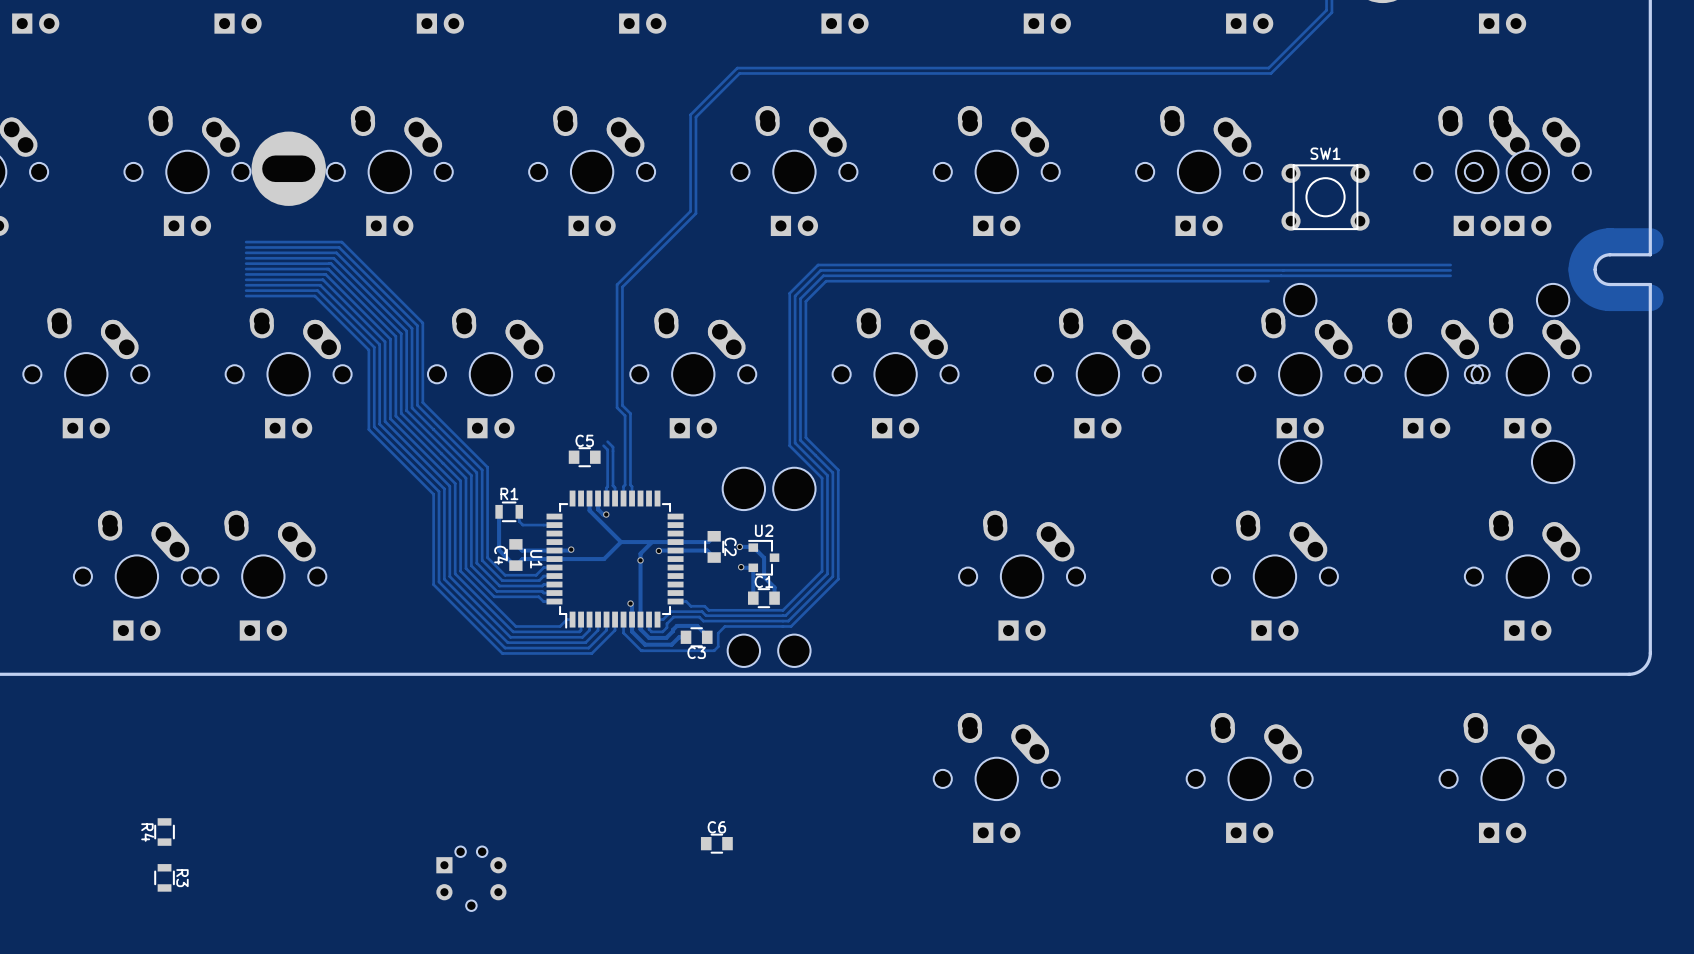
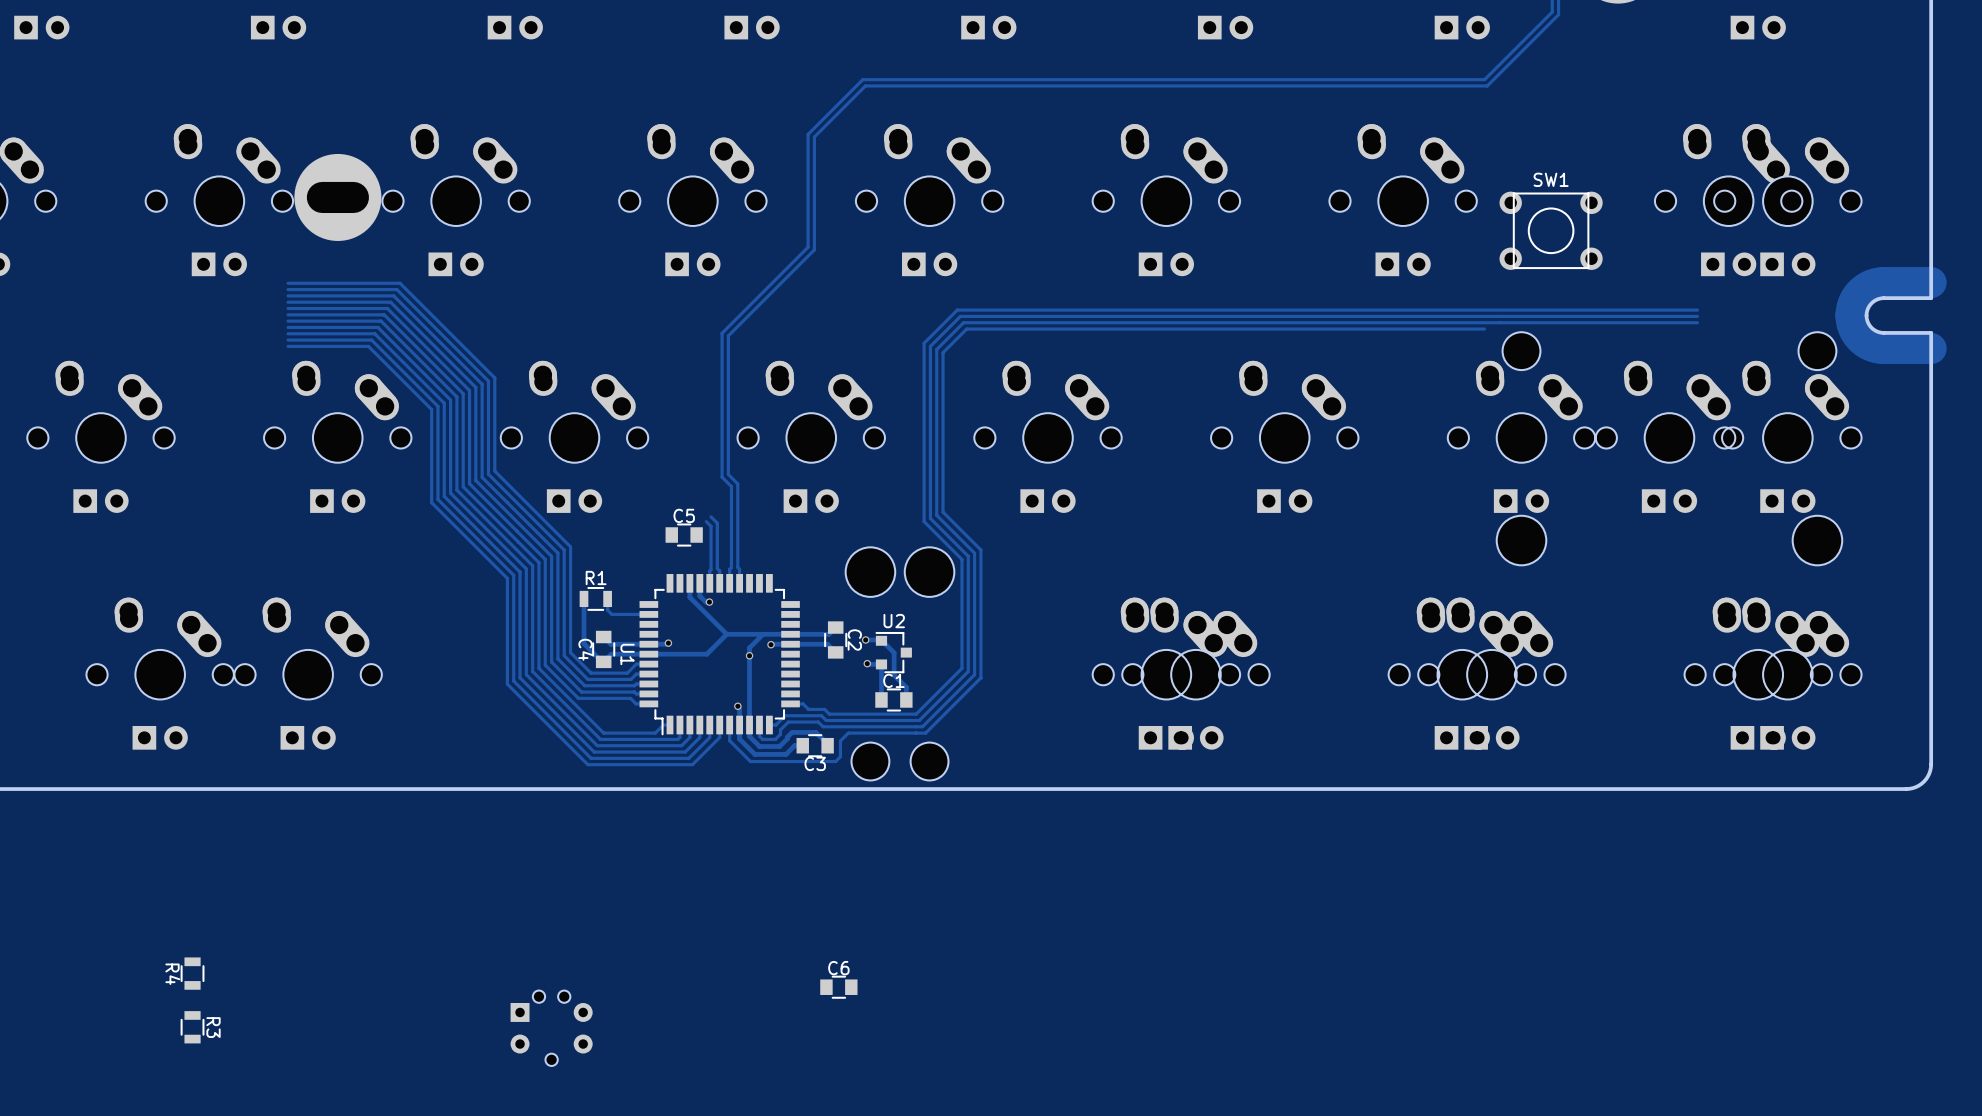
part: none -> (1166, 673)
part: none -> (1462, 673)
part: none -> (1758, 673)
part: (996, 777) -> none
part: (1249, 777) -> none
part: (1502, 777) -> none

